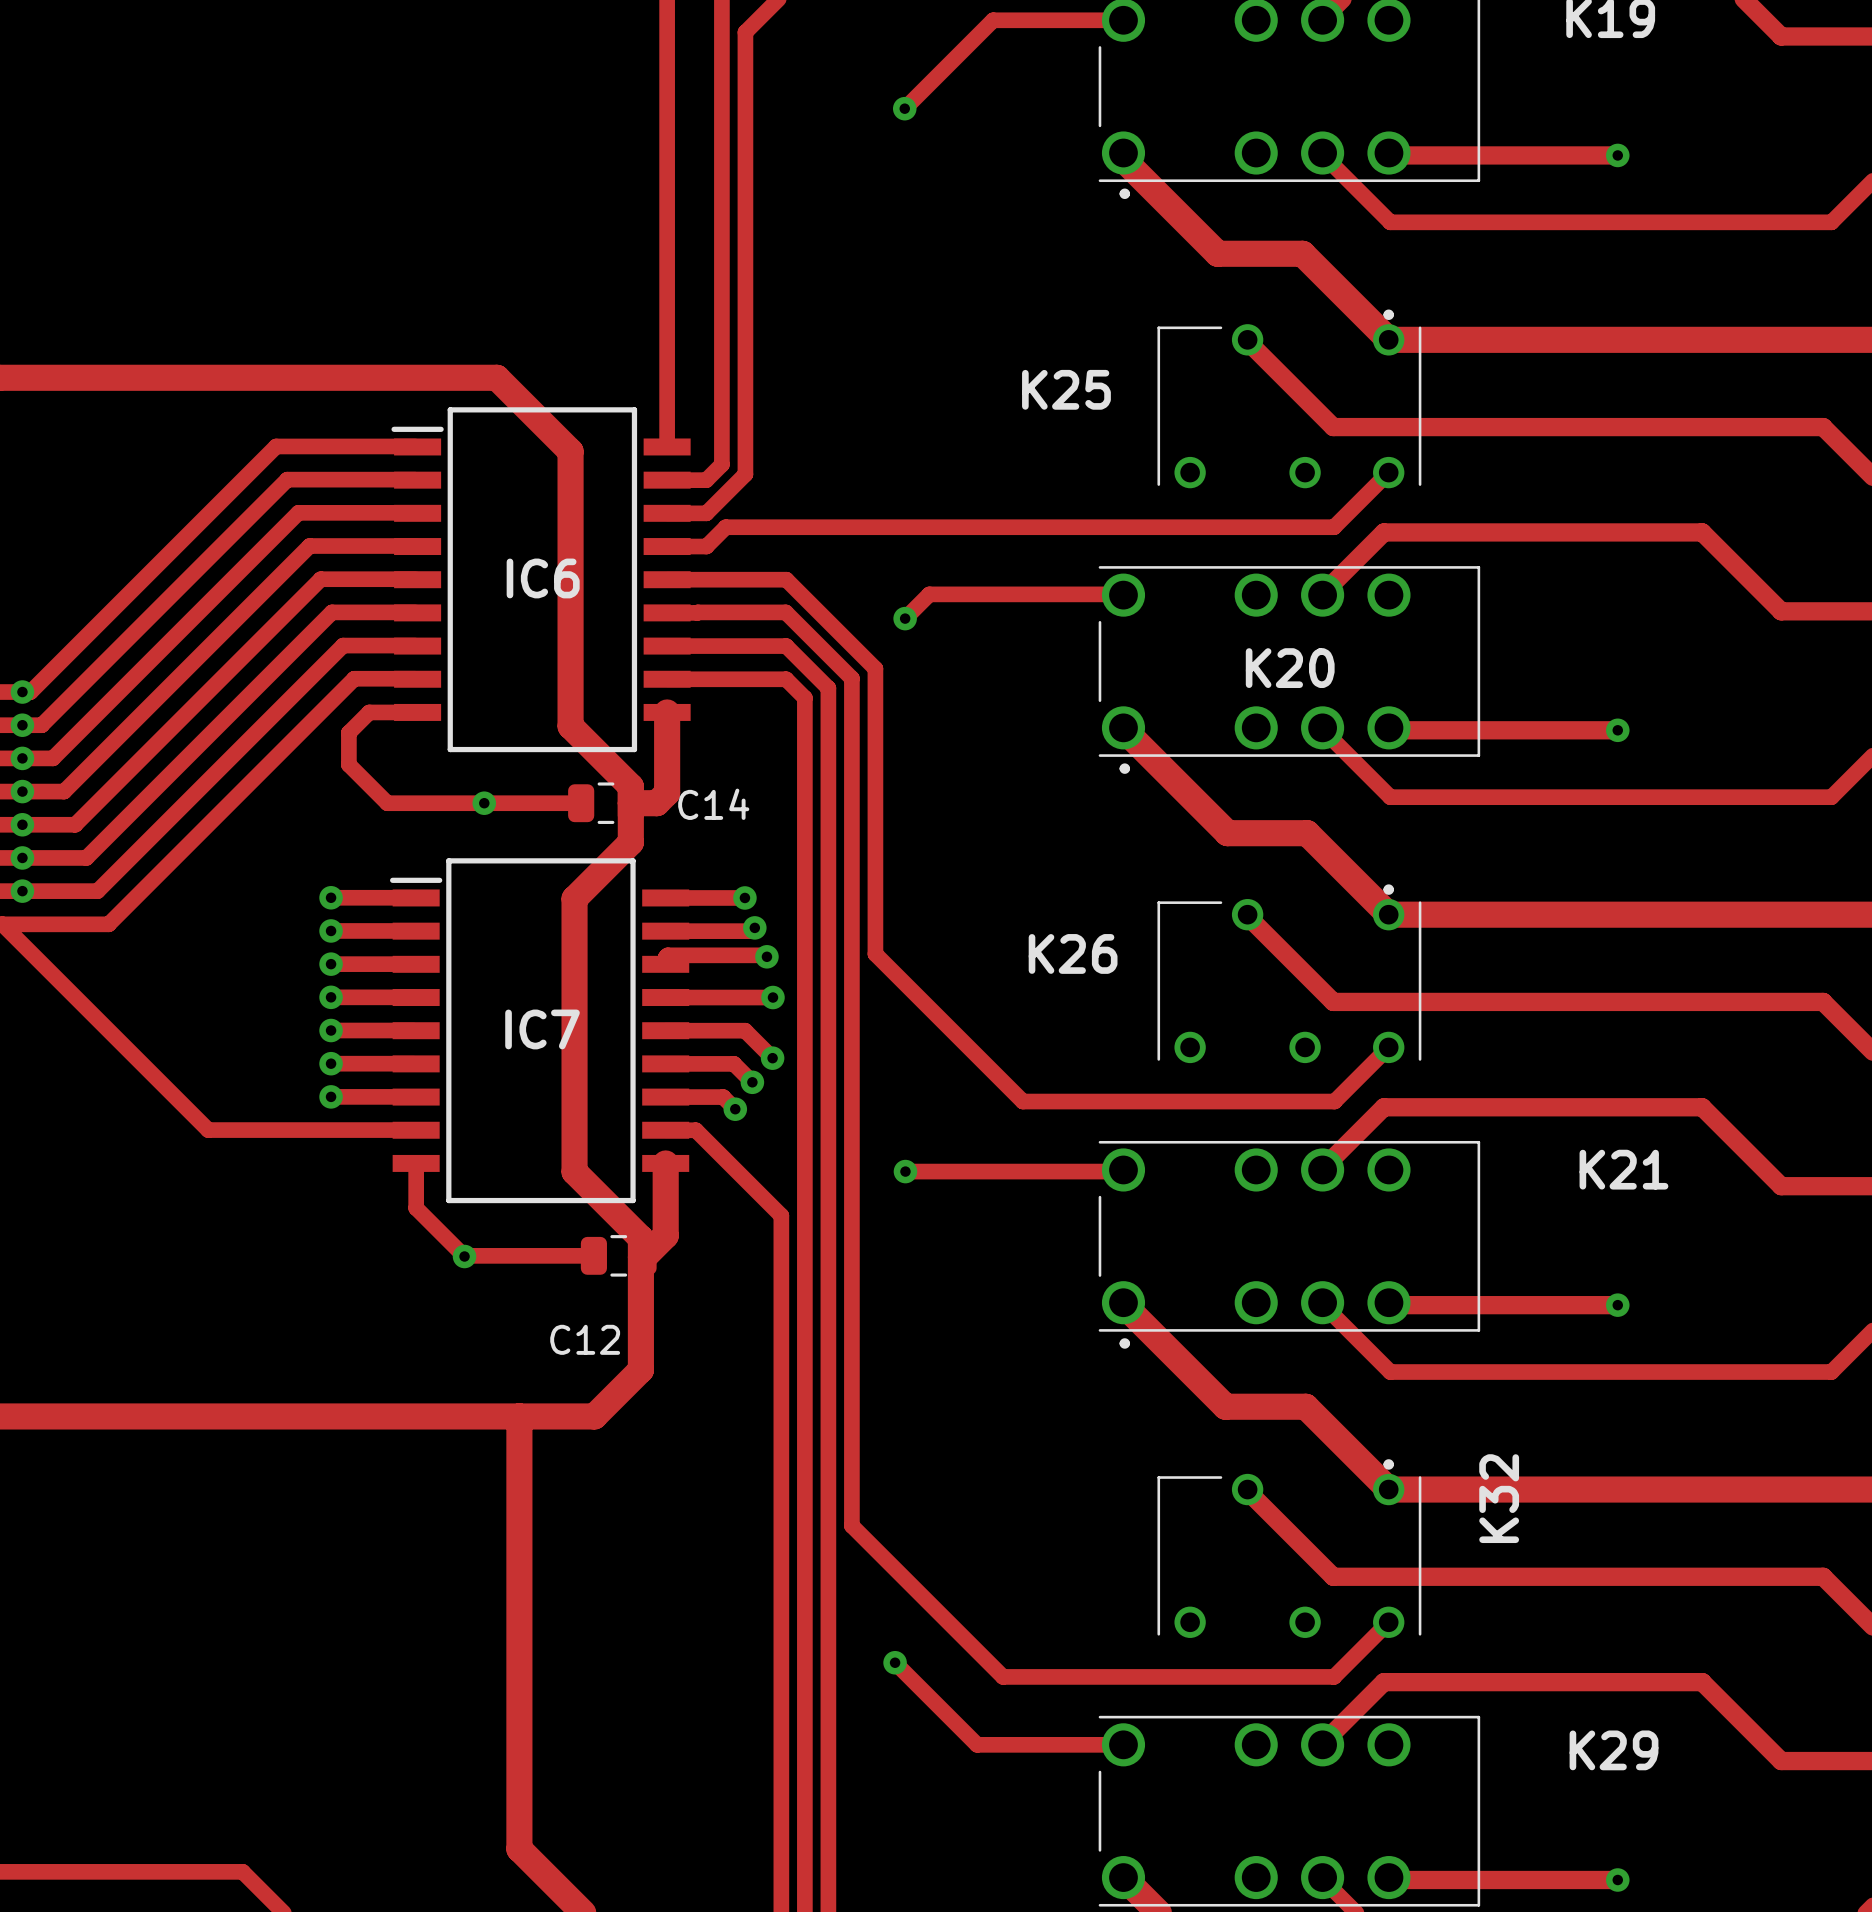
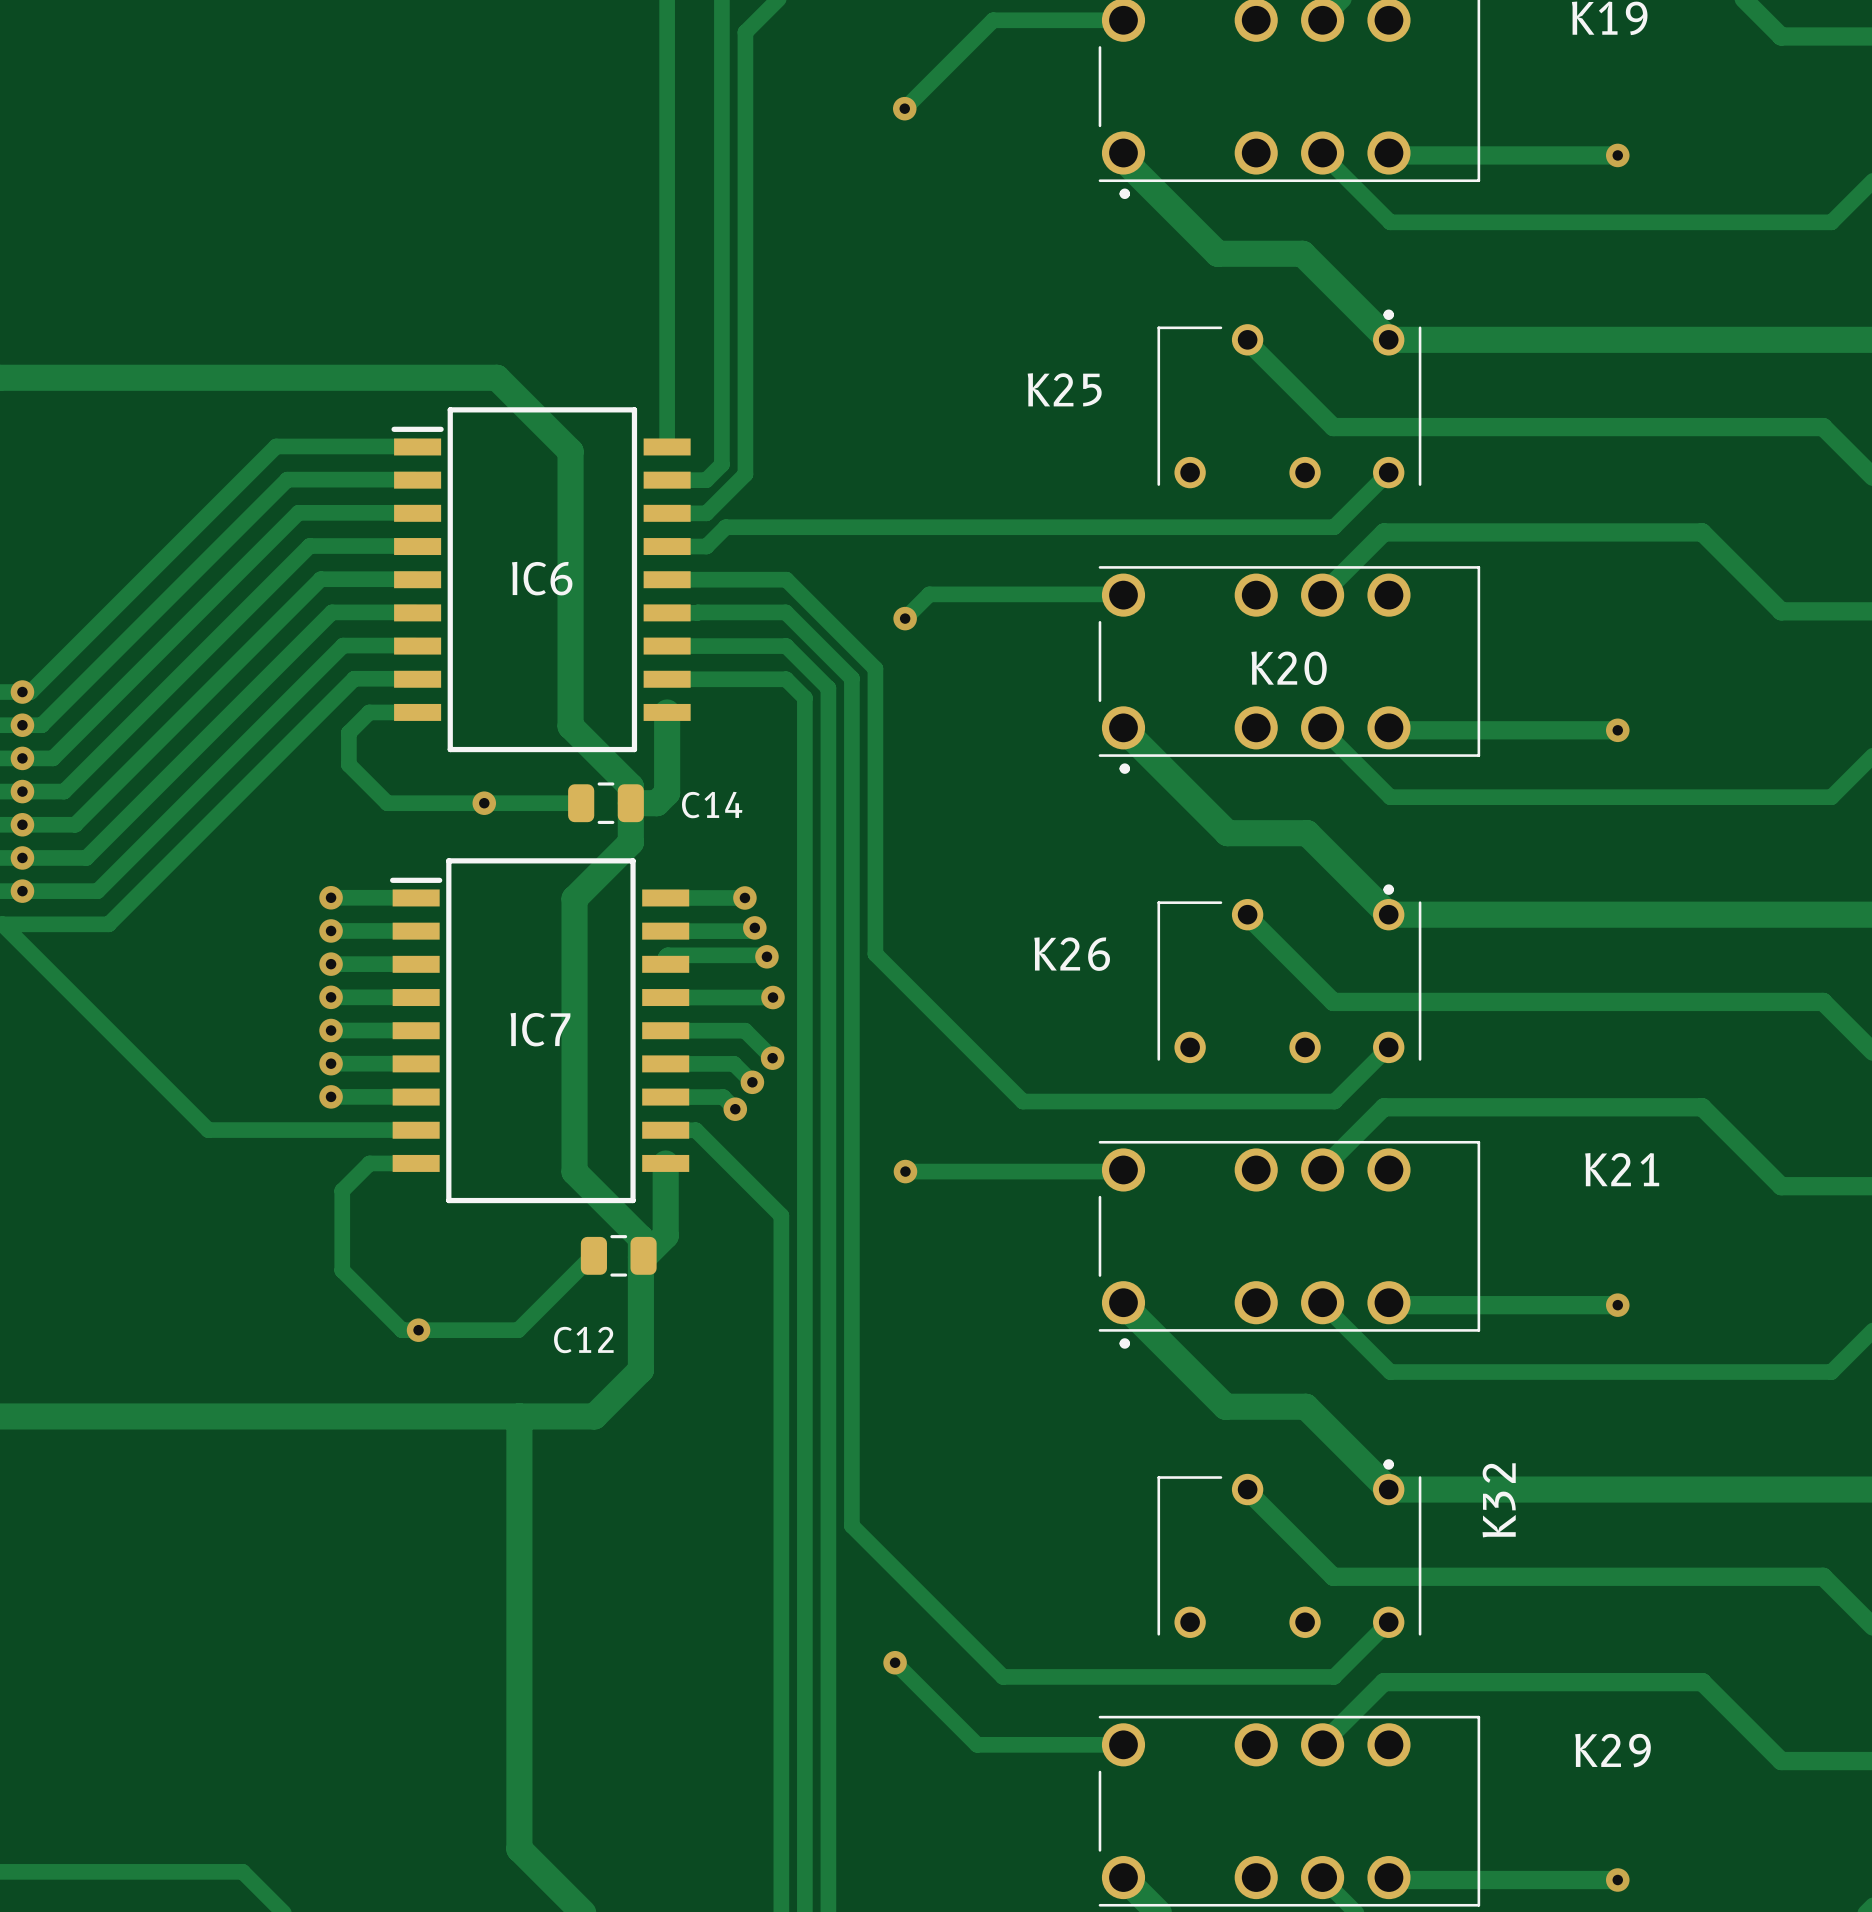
track: (416, 1163) (416, 1208) (464, 1256) (593, 1255) -> (416, 1163) (369, 1163) (342, 1190) (342, 1270) (401, 1330) (518, 1330) (591, 1257)
via position: (464, 1256) -> (418, 1330)

